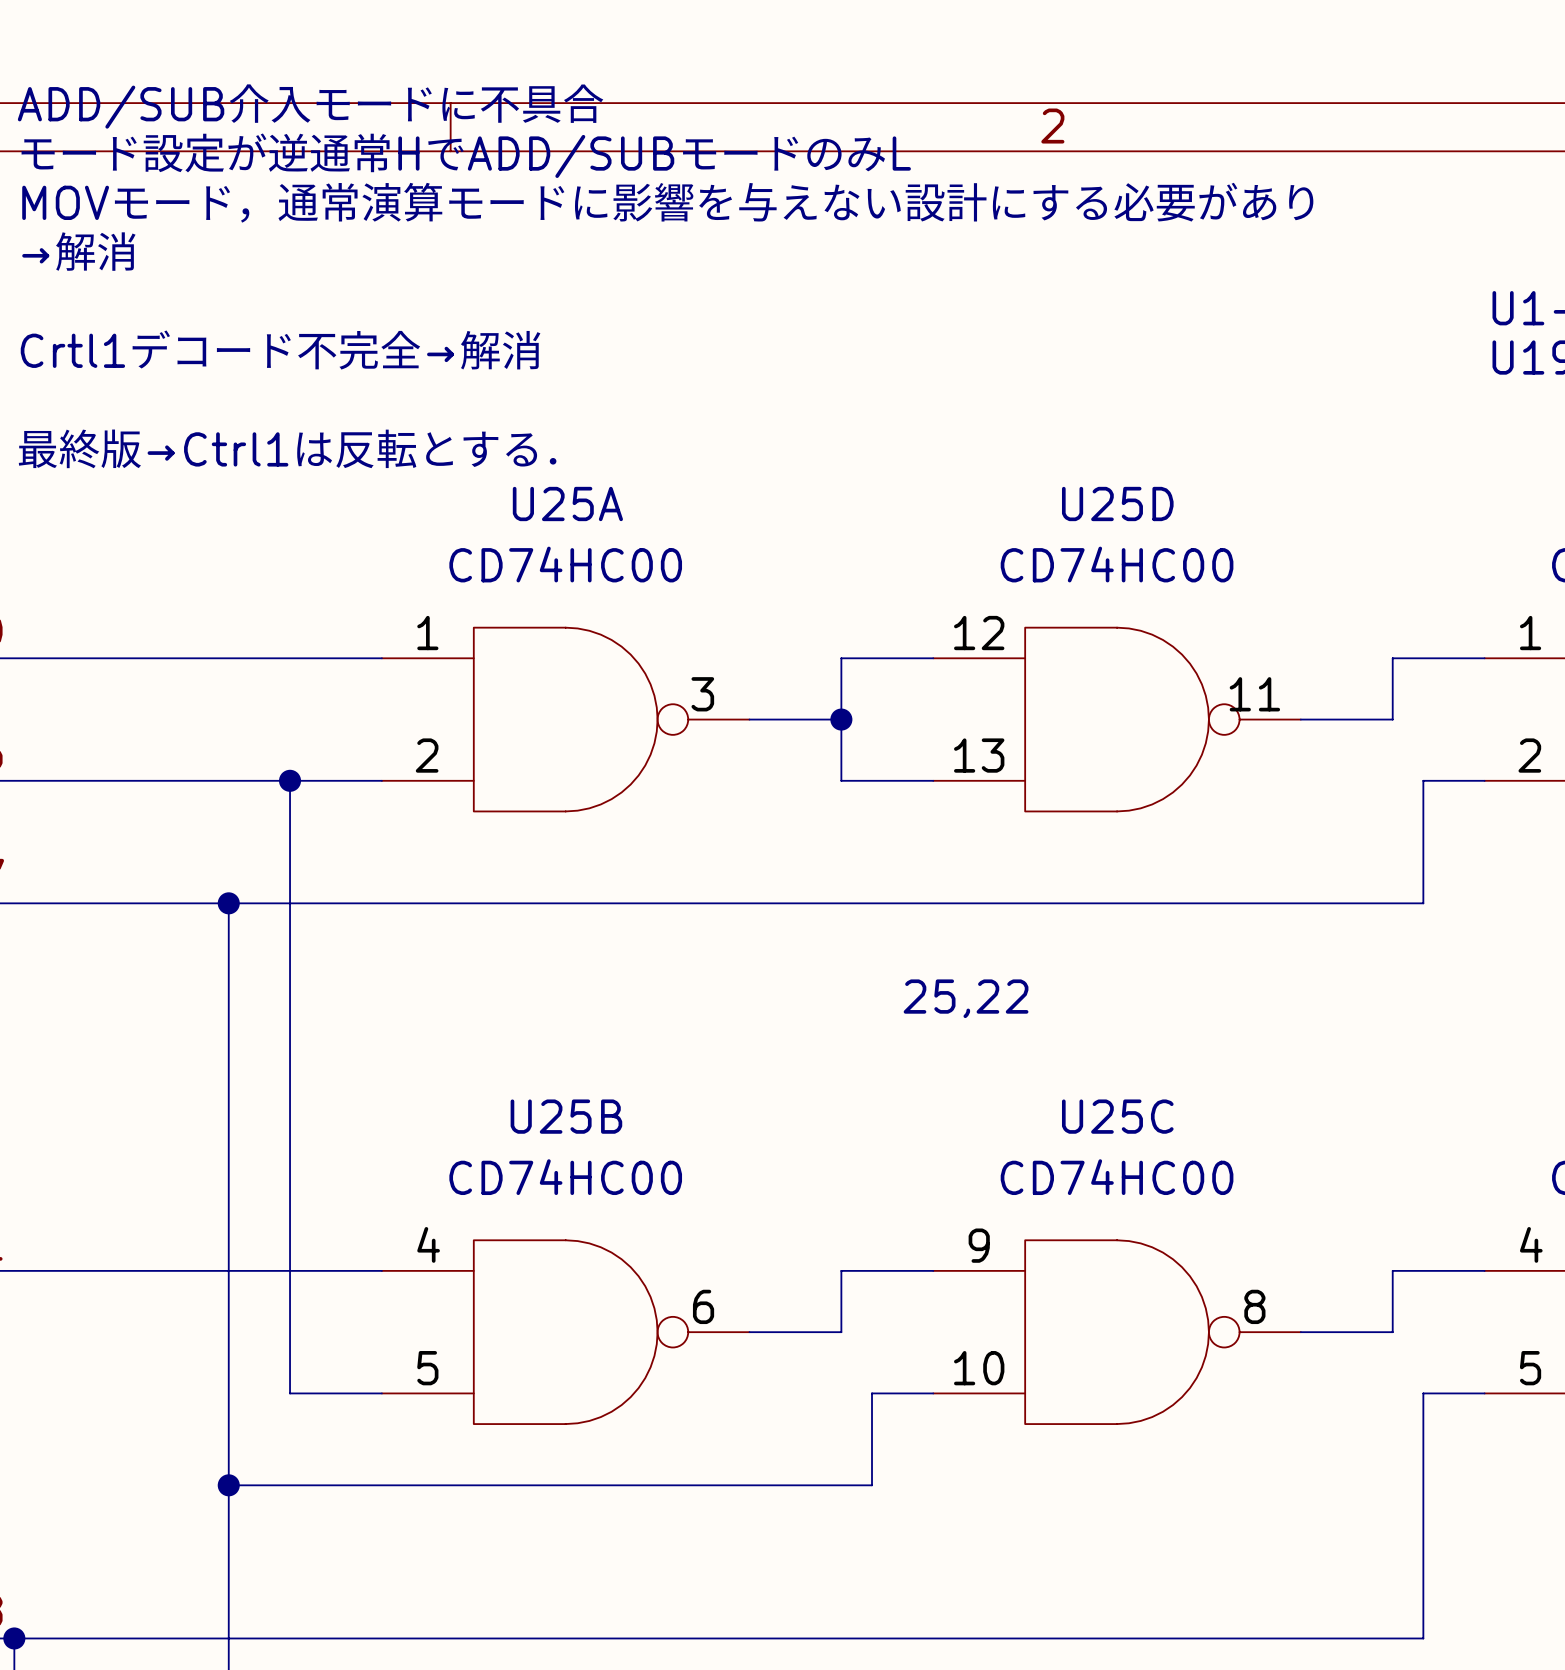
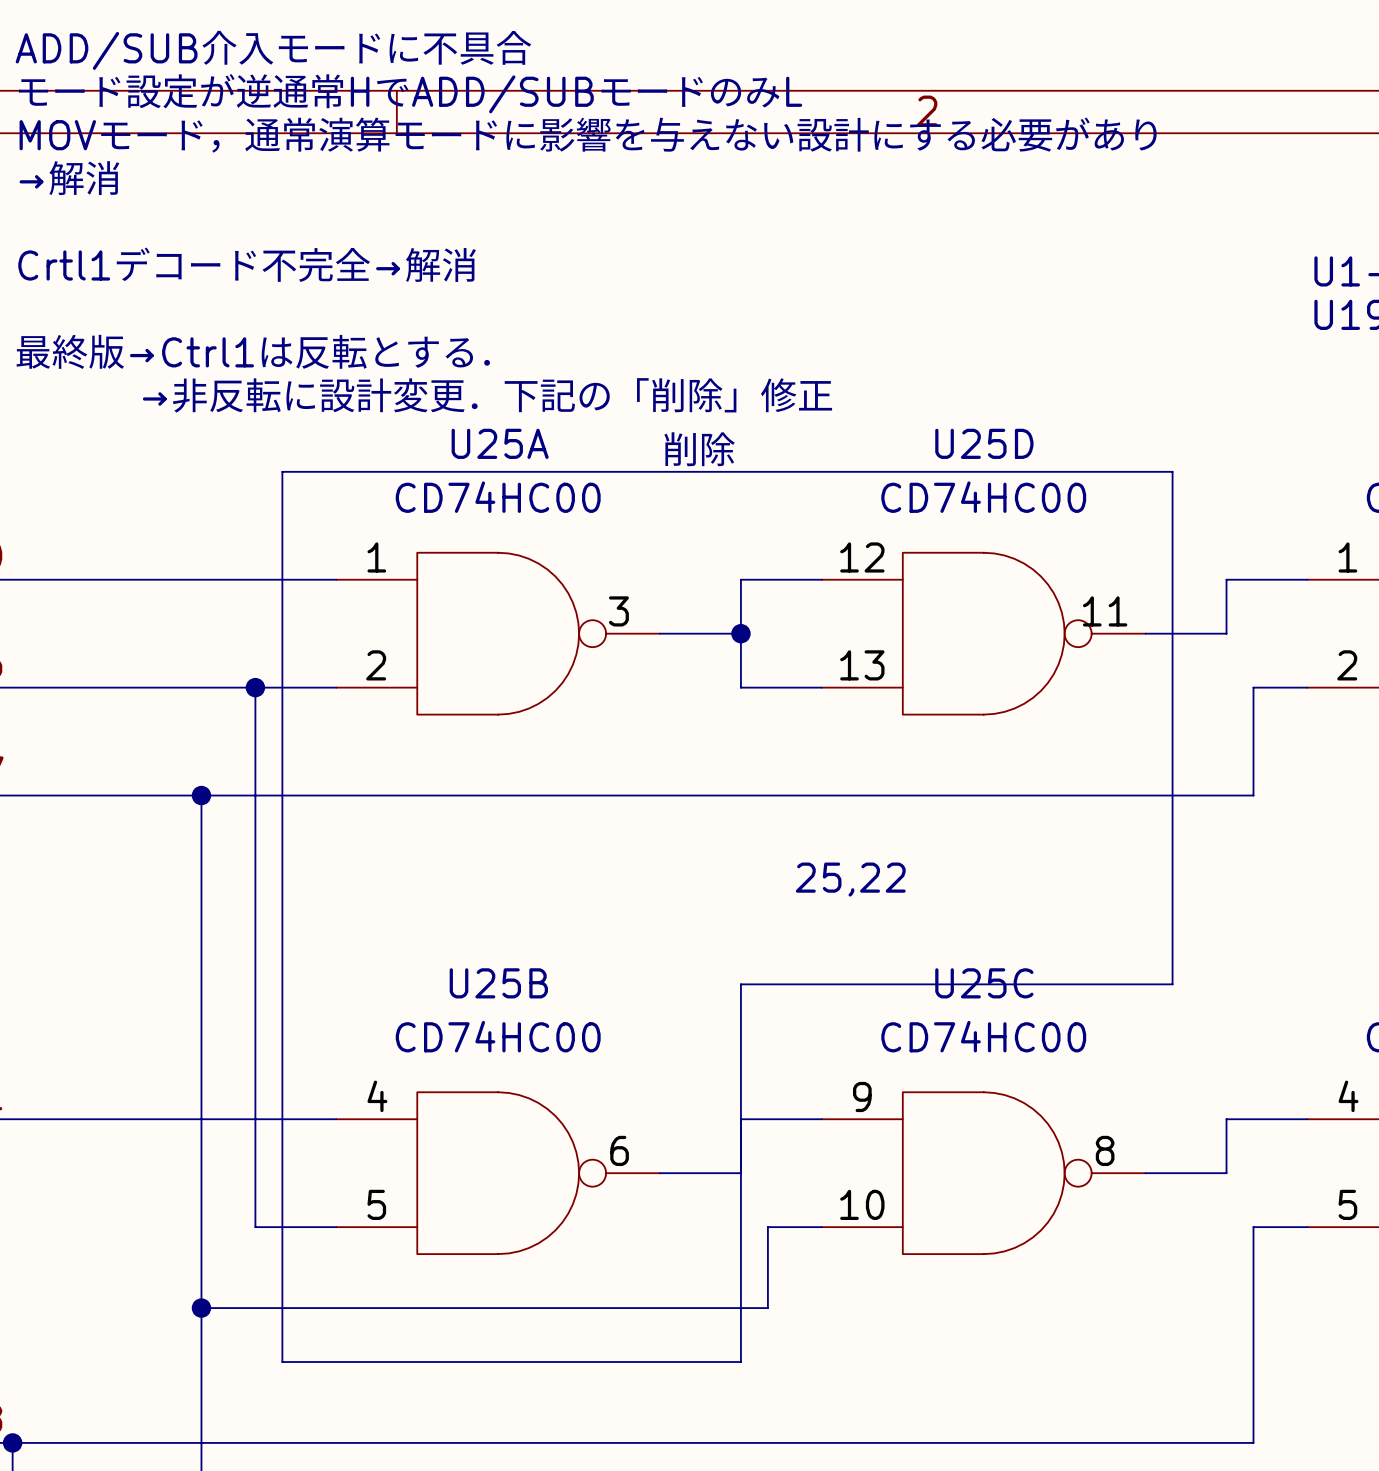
text: none -> ADD/SUB介入モードに不具合 (274, 49)
text: ADD/SUB介入モードに不具合 (311, 105) -> モード設定が逆通常HでADD/SUBモードのみL (409, 92)
text: モード設定が逆通常HでADD/SUBモードのみL (465, 154) -> MOVモード，通常演算モードに影響を与えない設計にする必要があり (588, 135)
text: MOVモード，通常演算モードに影響を与えない設計にする必要があり (668, 202) -> →解消 (70, 178)
text: →解消 (79, 251) -> none
text position: Crtl1デコード不完全→解消 (281, 350) -> Crtl1デコード不完全→解消 (247, 264)
text: none -> 最終版→Ctrl1は反転とする． (253, 351)
text: 最終版→Ctrl1は反転とする． (287, 448) -> →非反転に設計変更．下記の「削除」修正 (488, 395)
text: none -> 削除 (699, 449)
line: none -> (282, 471) (282, 1362) (740, 1362) (740, 984) (1172, 984) (1172, 471) (282, 471)

